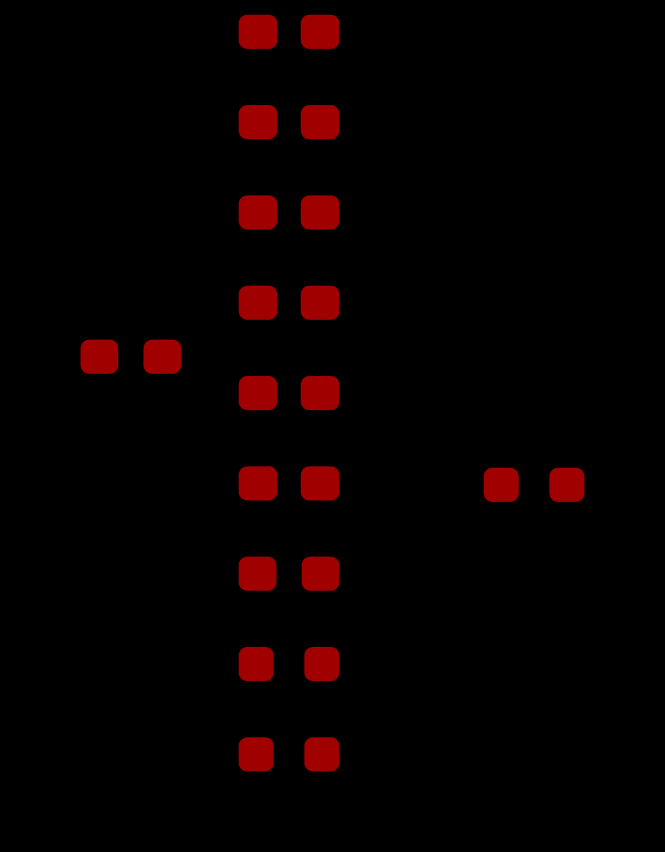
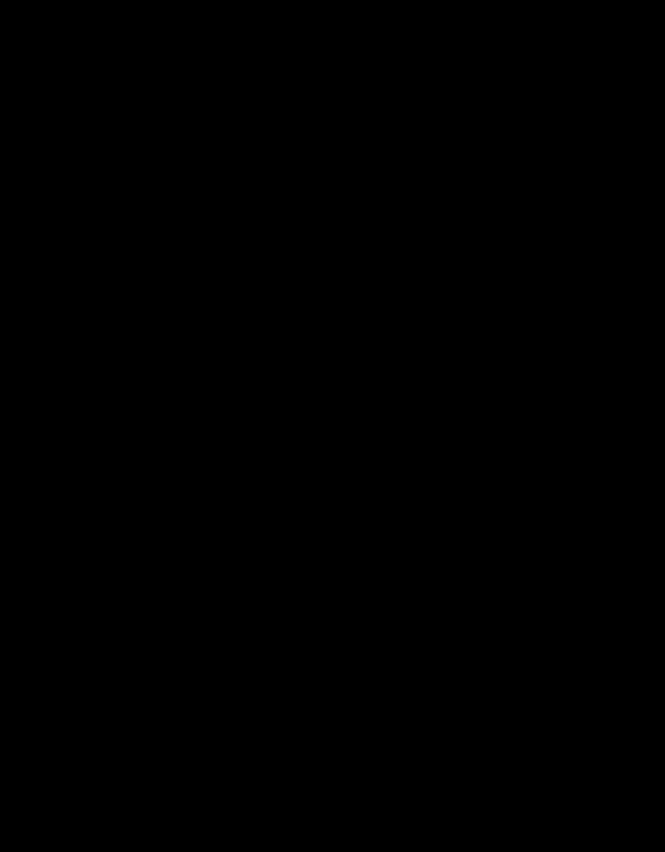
part: (289, 31) -> none
part: (289, 122) -> none
part: (289, 212) -> none
part: (289, 302) -> none
part: (130, 356) -> none
part: (289, 393) -> none
part: (289, 483) -> none
part: (534, 484) -> none
part: (289, 573) -> none
part: (289, 664) -> none
part: (289, 754) -> none

